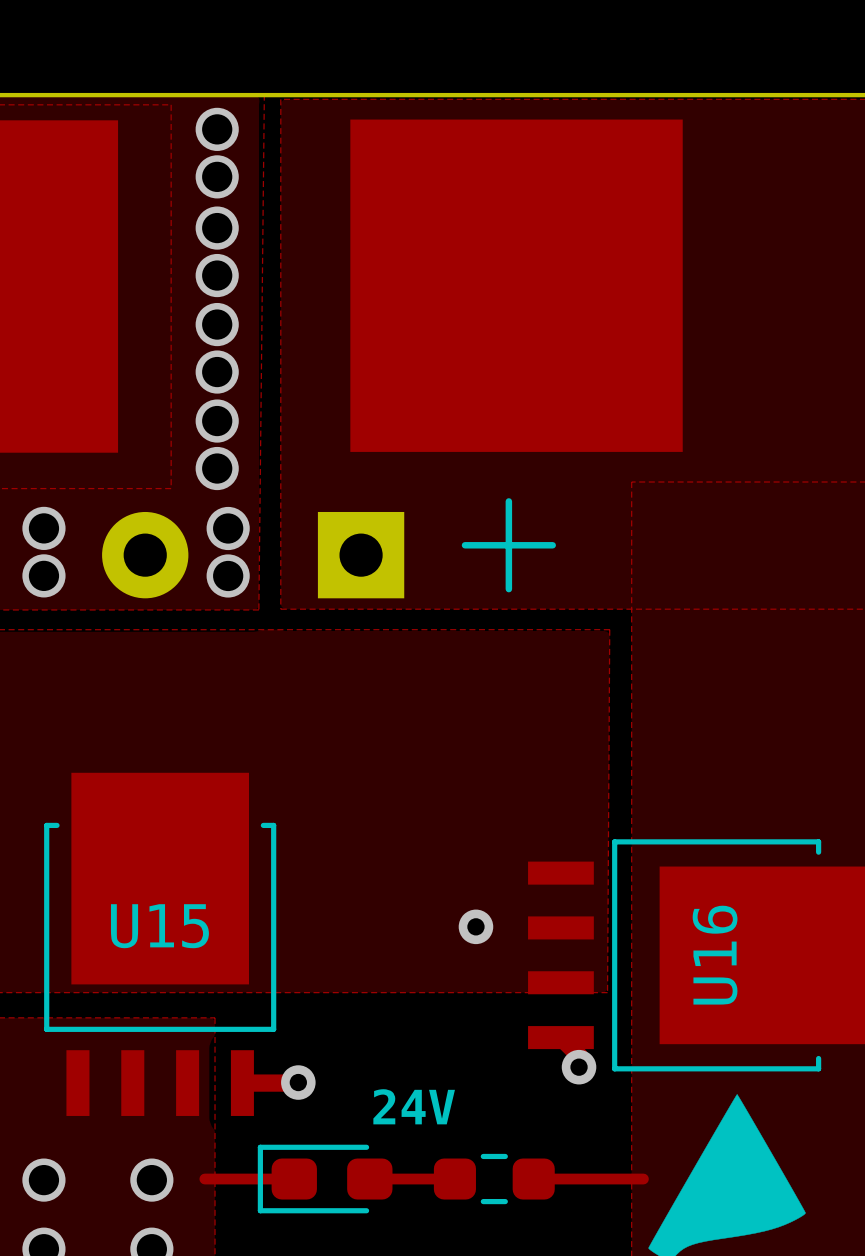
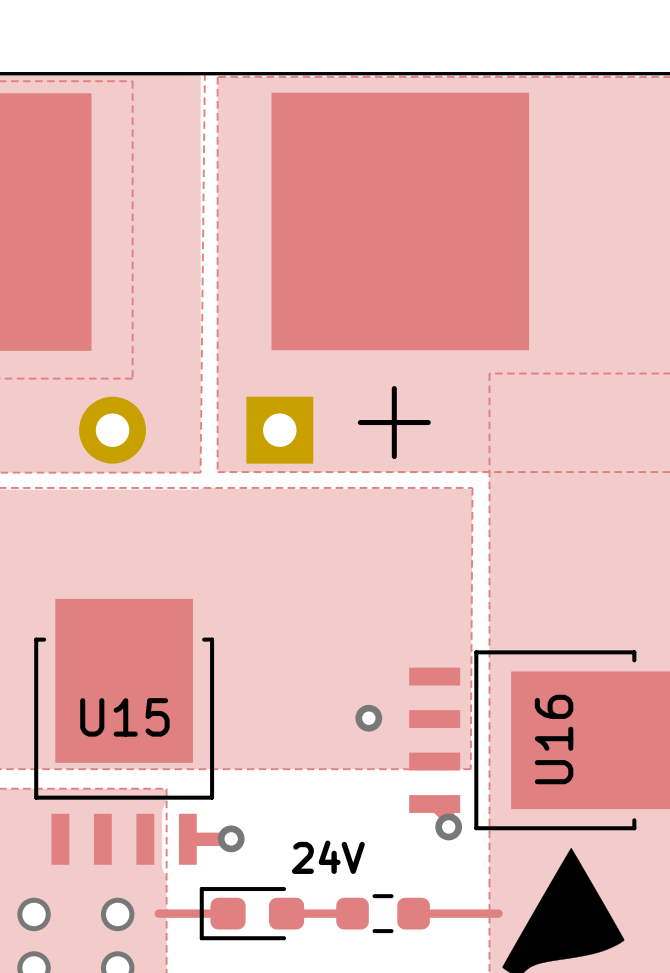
via: (217, 129) -> none
via: (217, 176) -> none
via: (217, 228) -> none
via: (217, 275) -> none
via: (217, 324) -> none
via: (217, 372) -> none
via: (217, 421) -> none
via: (217, 468) -> none
via: (43, 528) -> none
via: (228, 528) -> none
via: (43, 575) -> none
via: (228, 575) -> none

